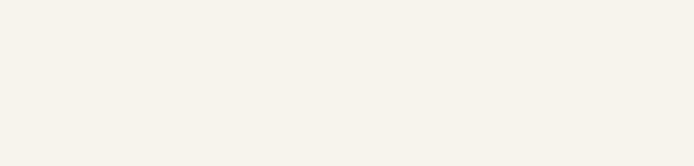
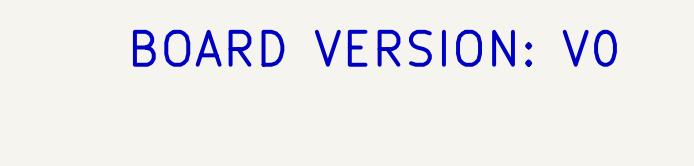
text: none -> BOARD VERSION: V0 (374, 48)

